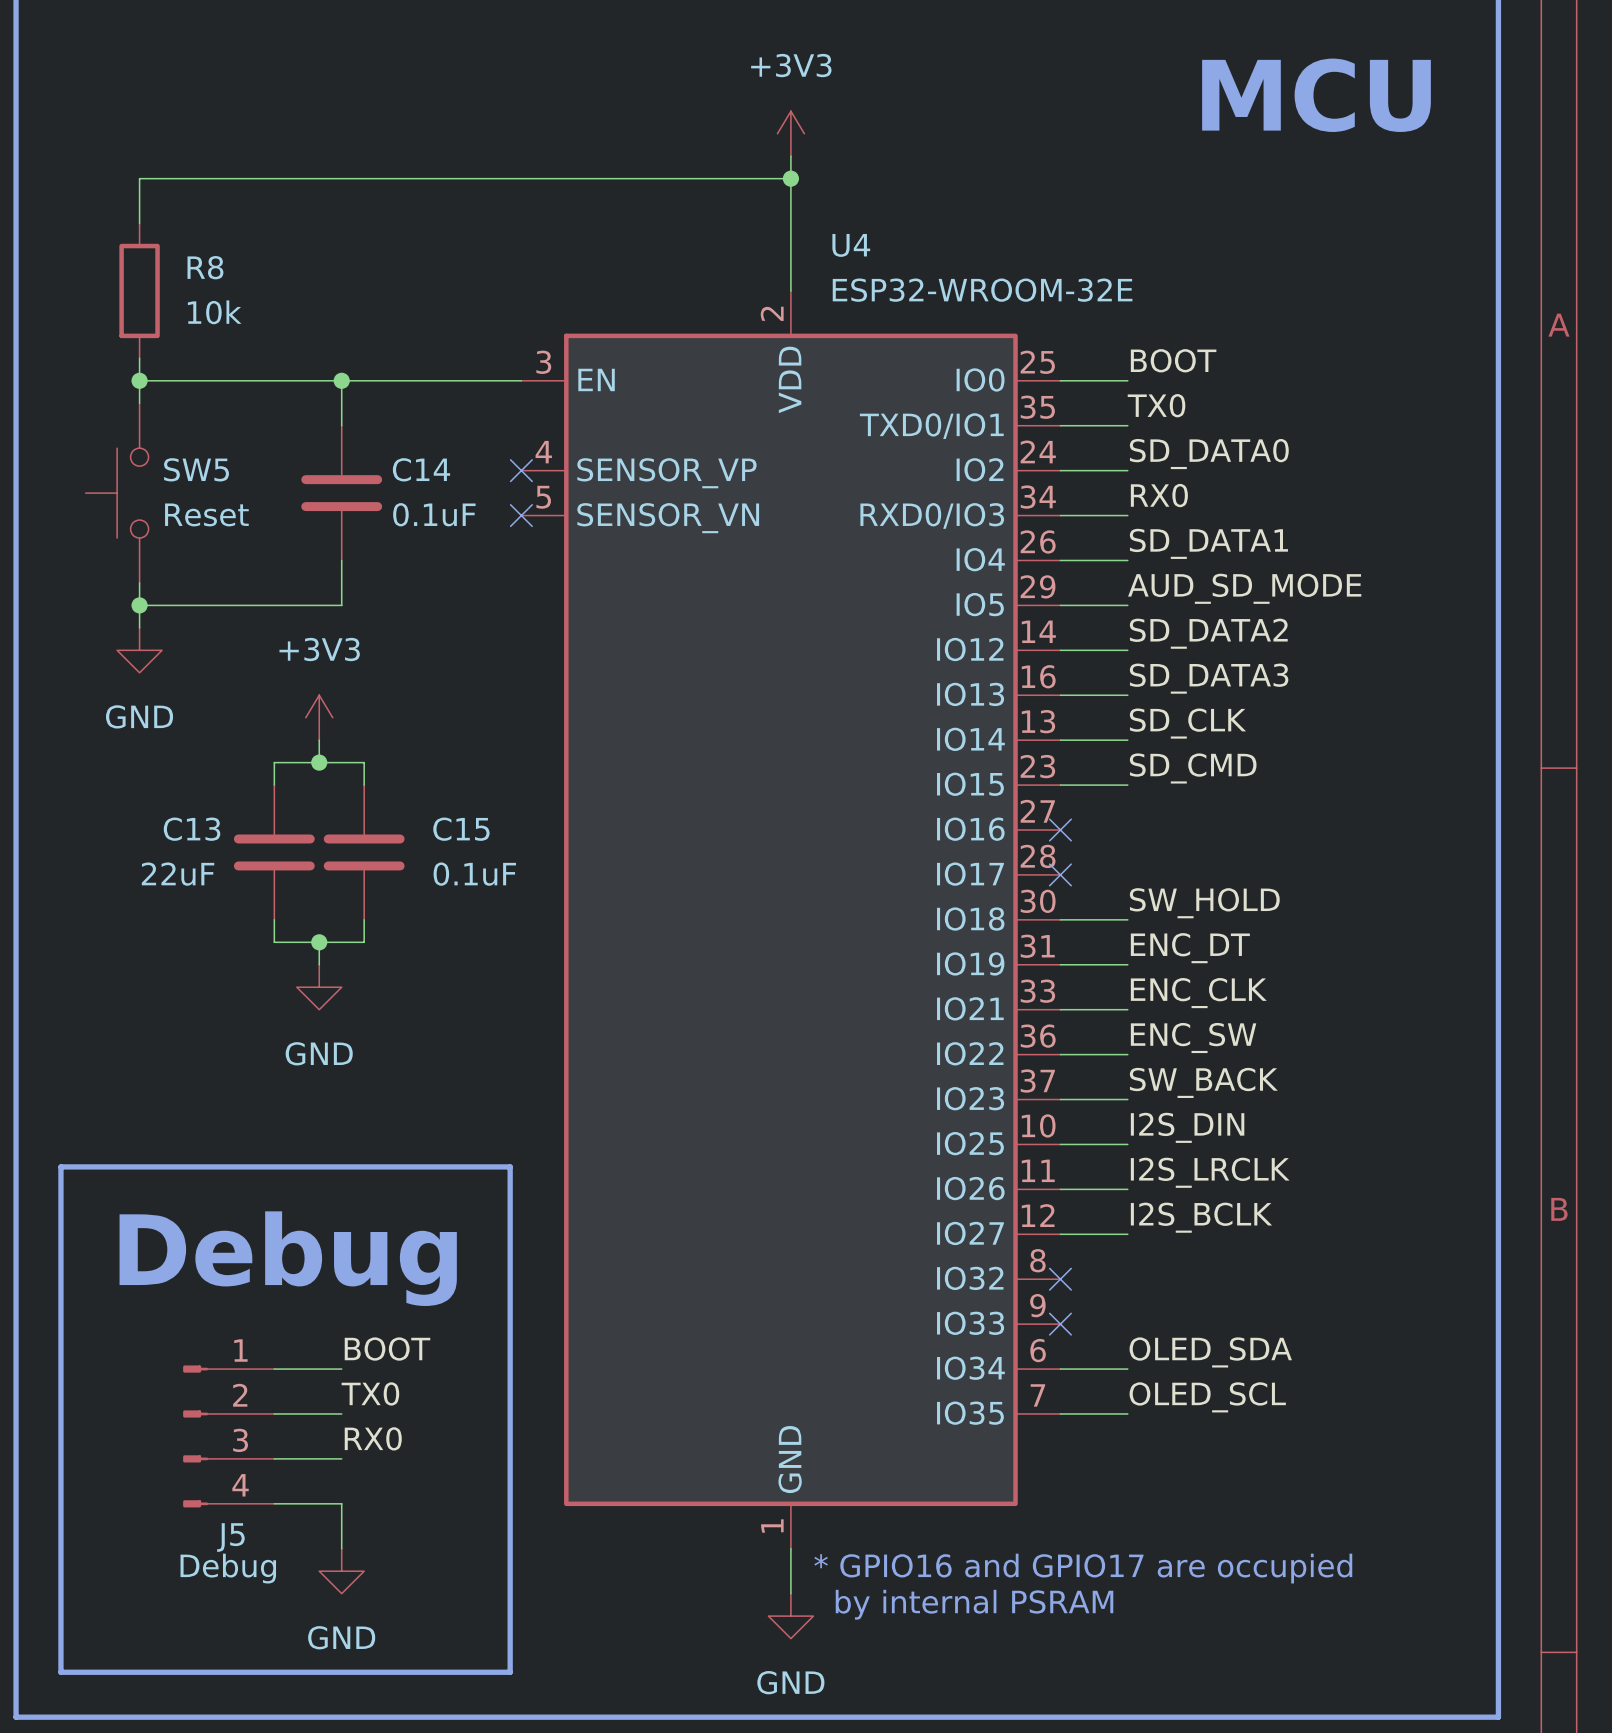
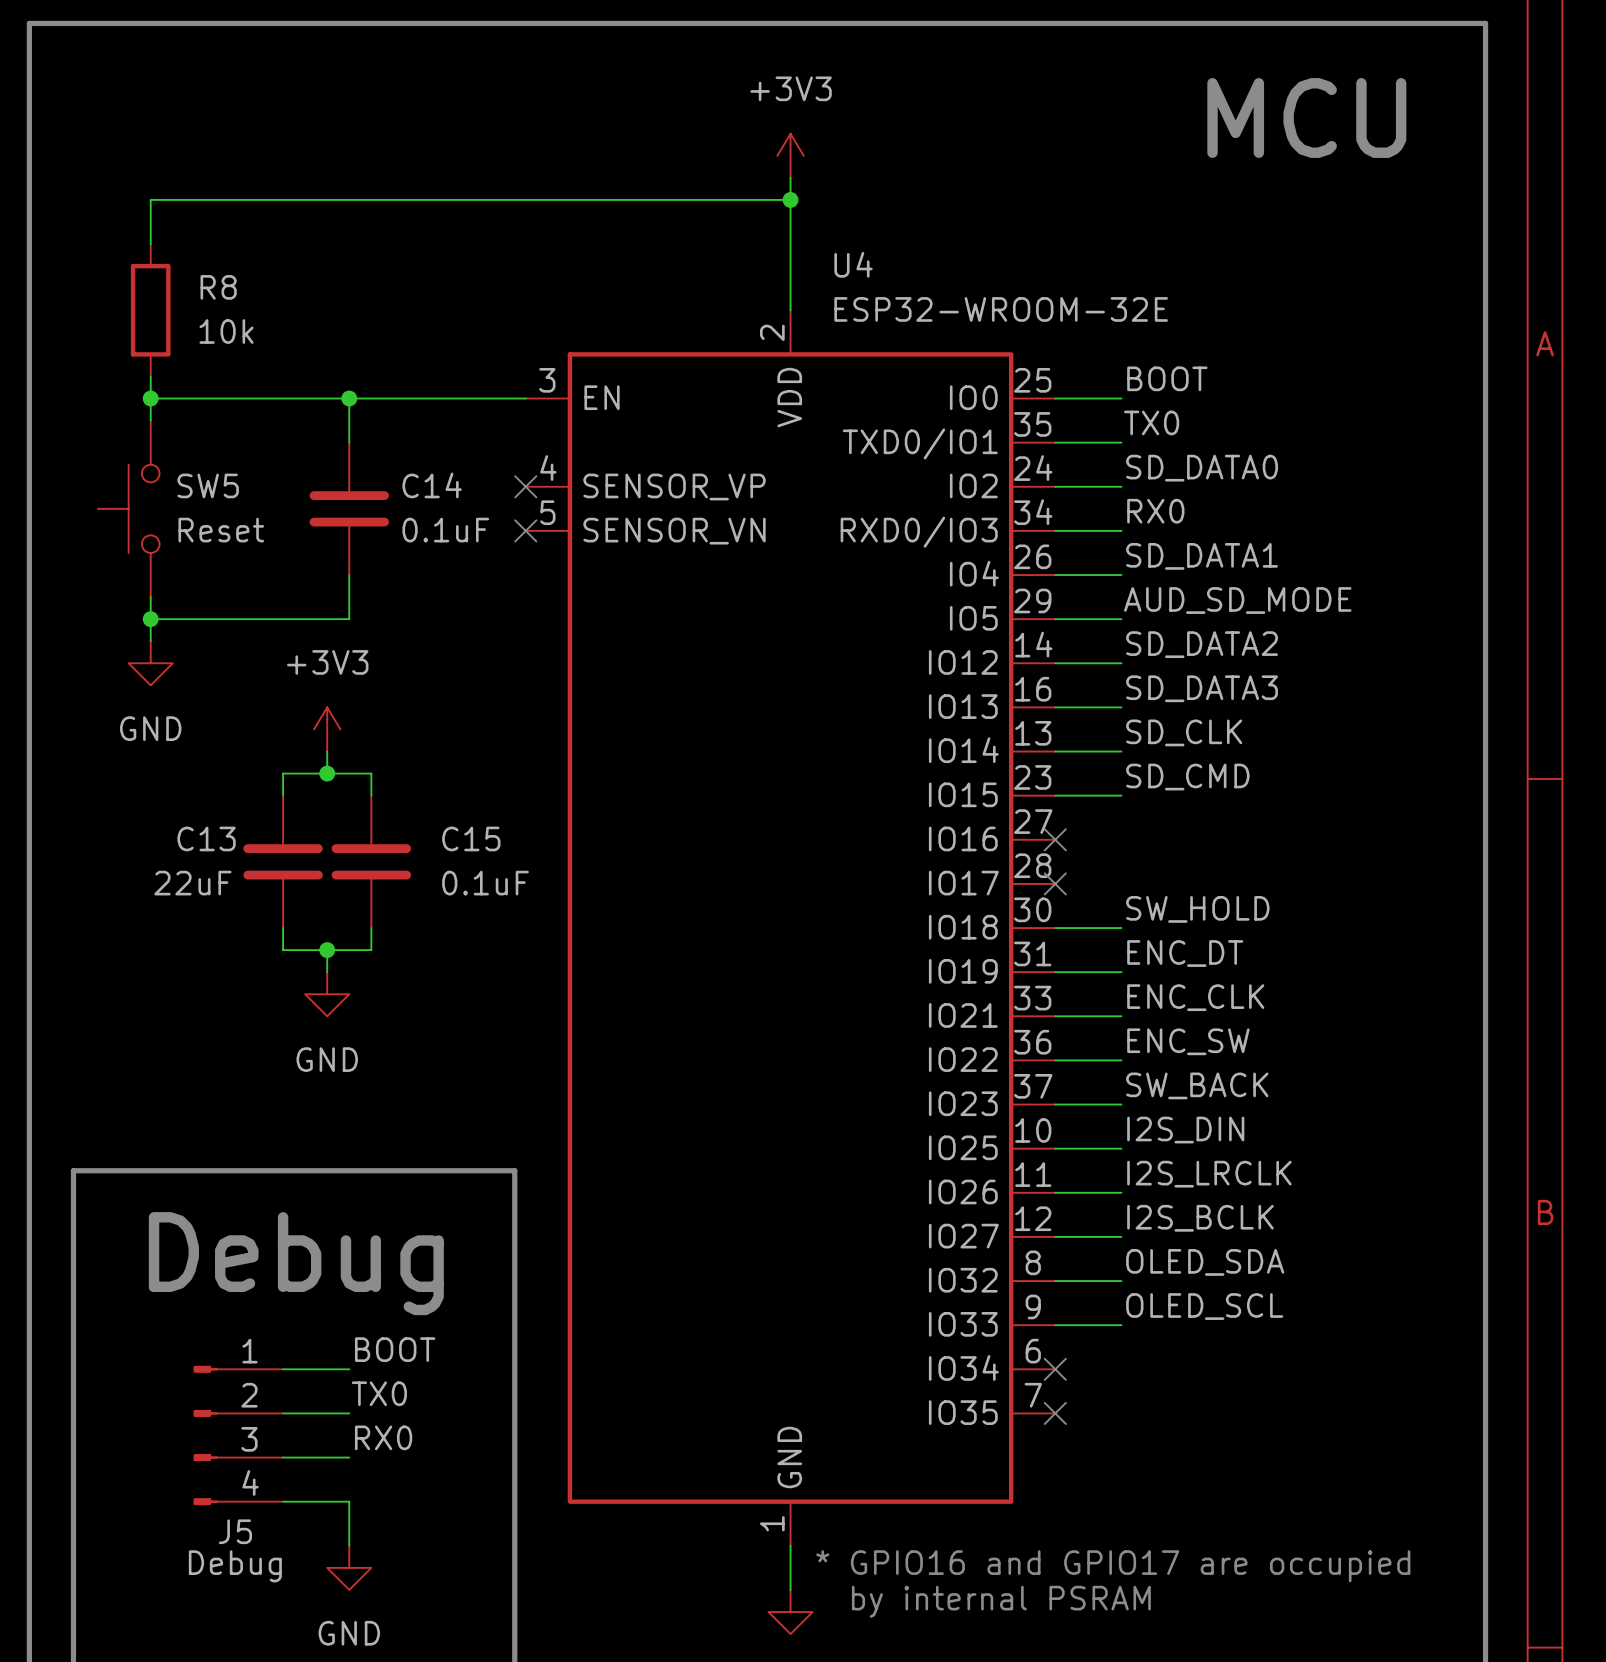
no-connect mark: (1060, 1279) -> none
no-connect mark: (1060, 1324) -> none
label position: OLED_SDA (1210, 1352) -> OLED_SDA (1205, 1262)
wire: (1060, 1369) (1127, 1369) -> (1055, 1325) (1121, 1325)
no-connect mark: none -> (1055, 1369)
label position: OLED_SCL (1207, 1397) -> OLED_SCL (1204, 1306)
wire: (1060, 1413) (1127, 1413) -> (1055, 1281) (1121, 1281)
no-connect mark: none -> (1055, 1413)

